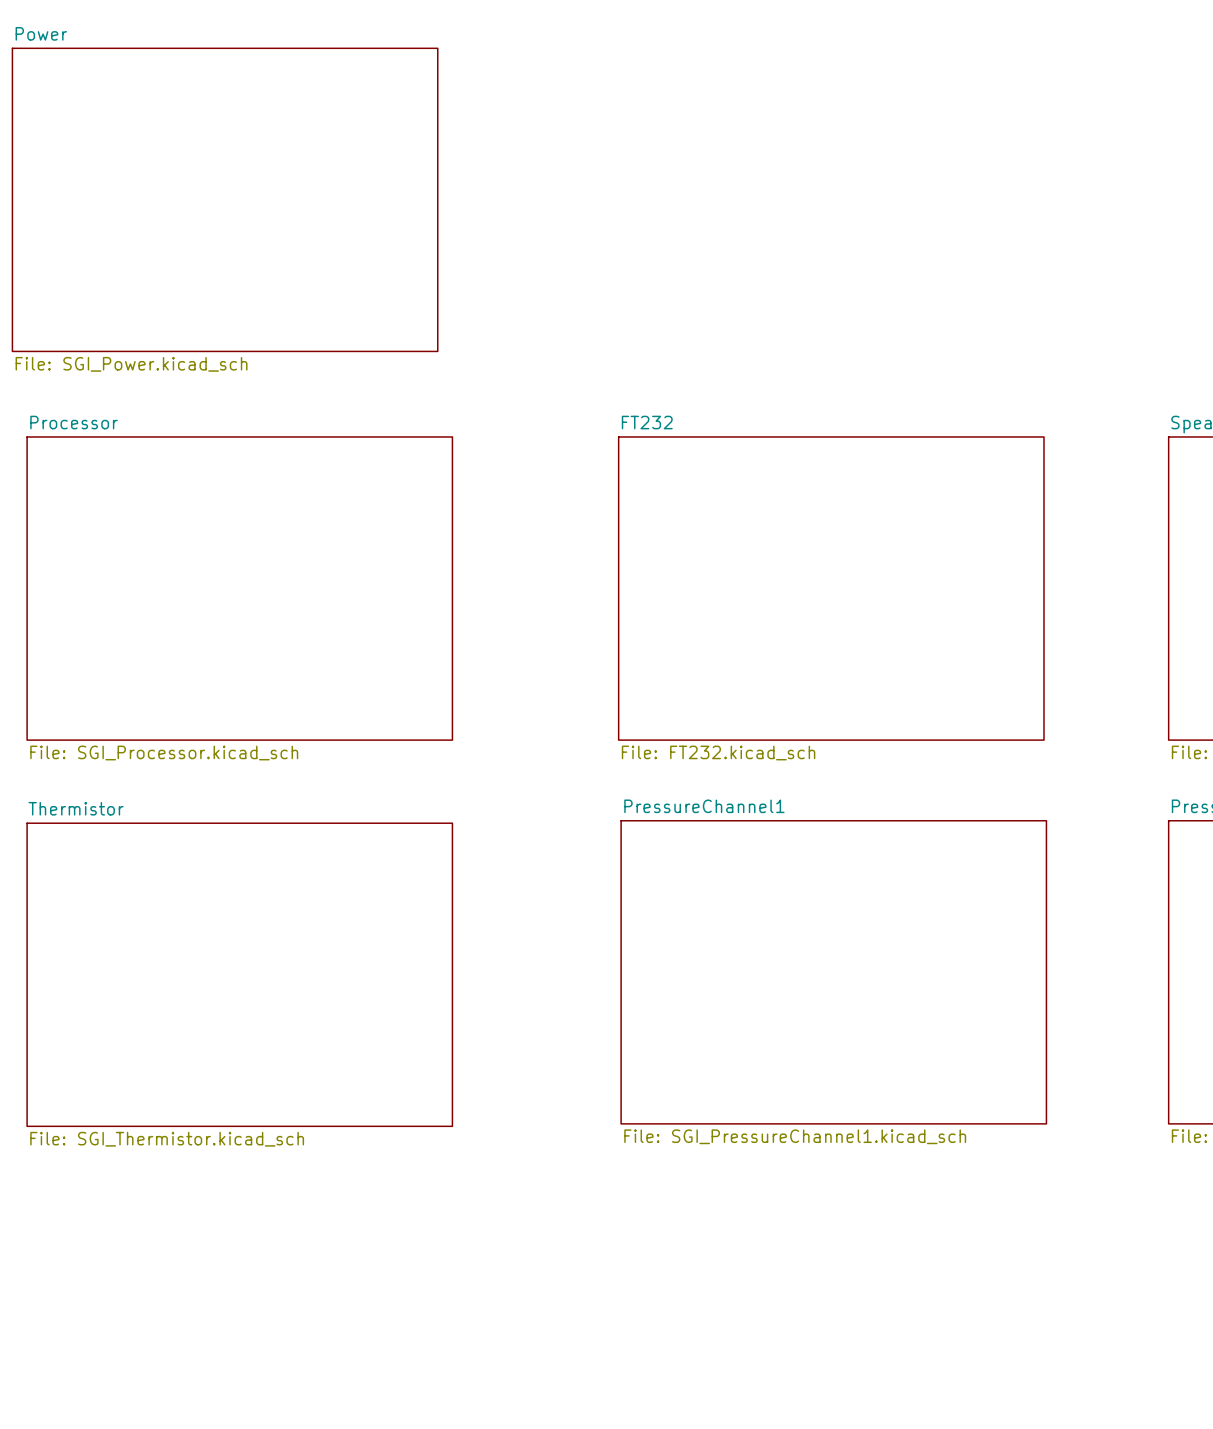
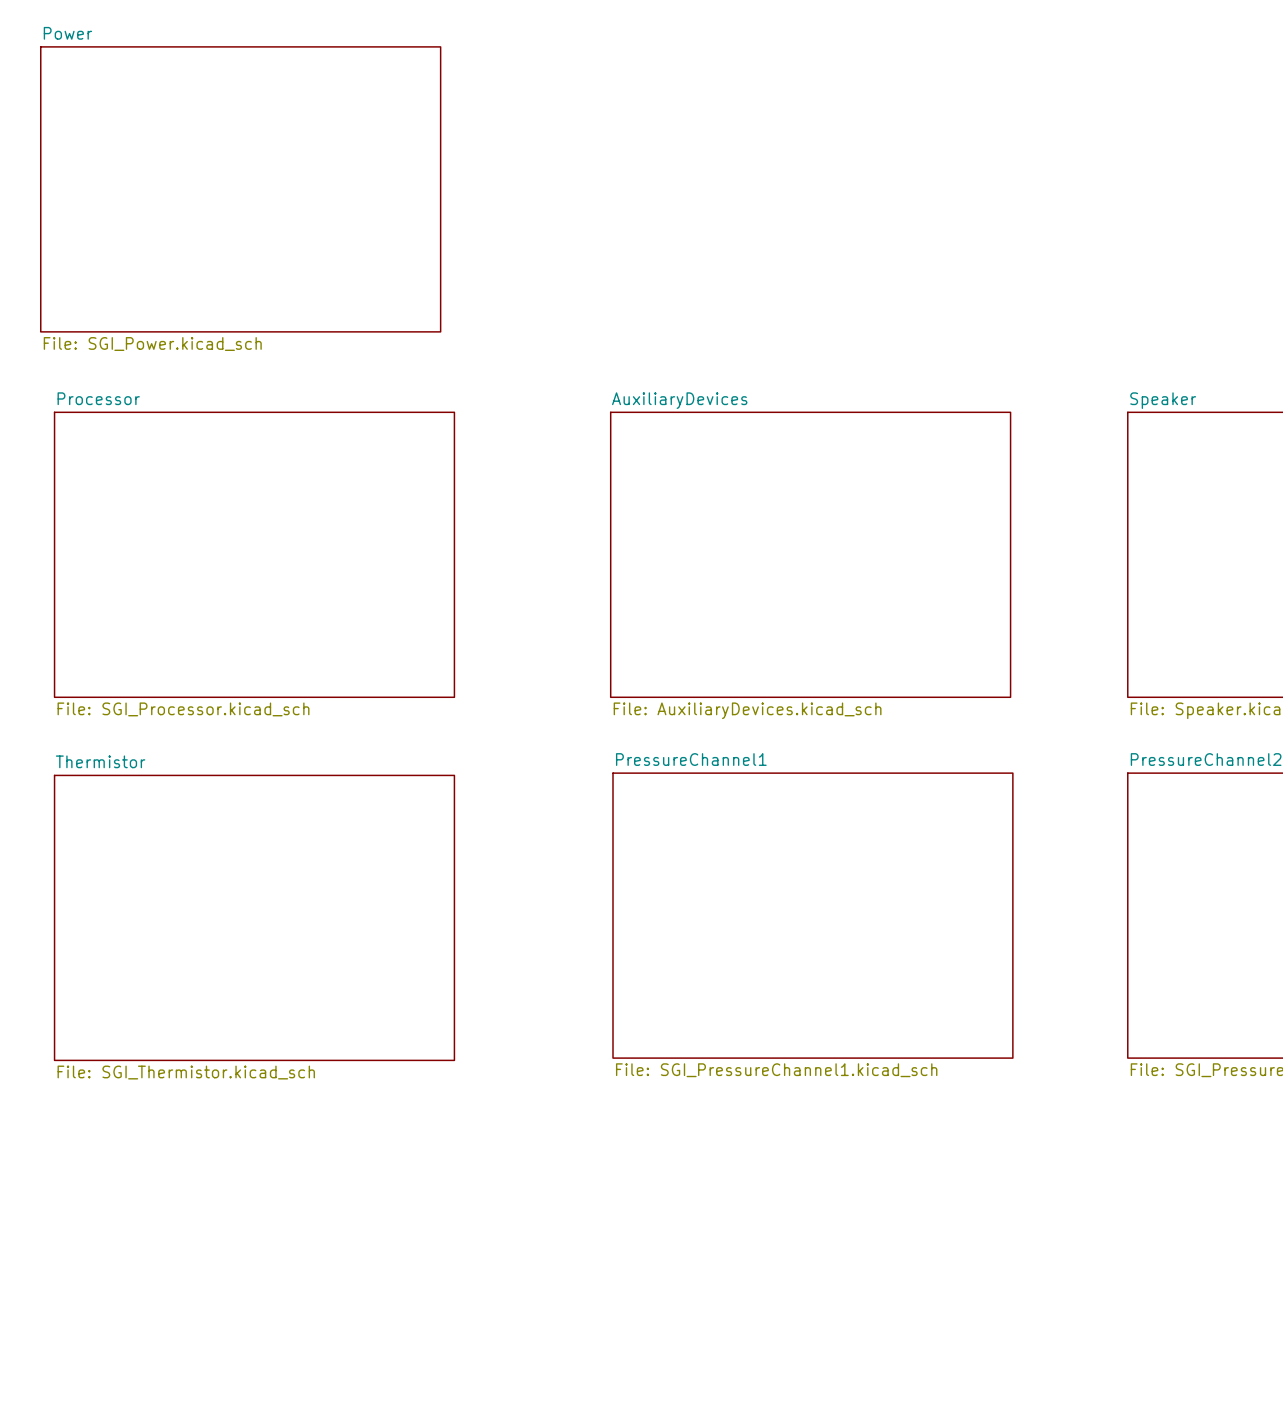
sheet FT232 name: FT232 (647, 422) -> AuxiliaryDevices (679, 400)
sheet FT232 value: File: FT232.kicad_sch (718, 753) -> File: AuxiliaryDevices.kicad_sch (747, 710)

